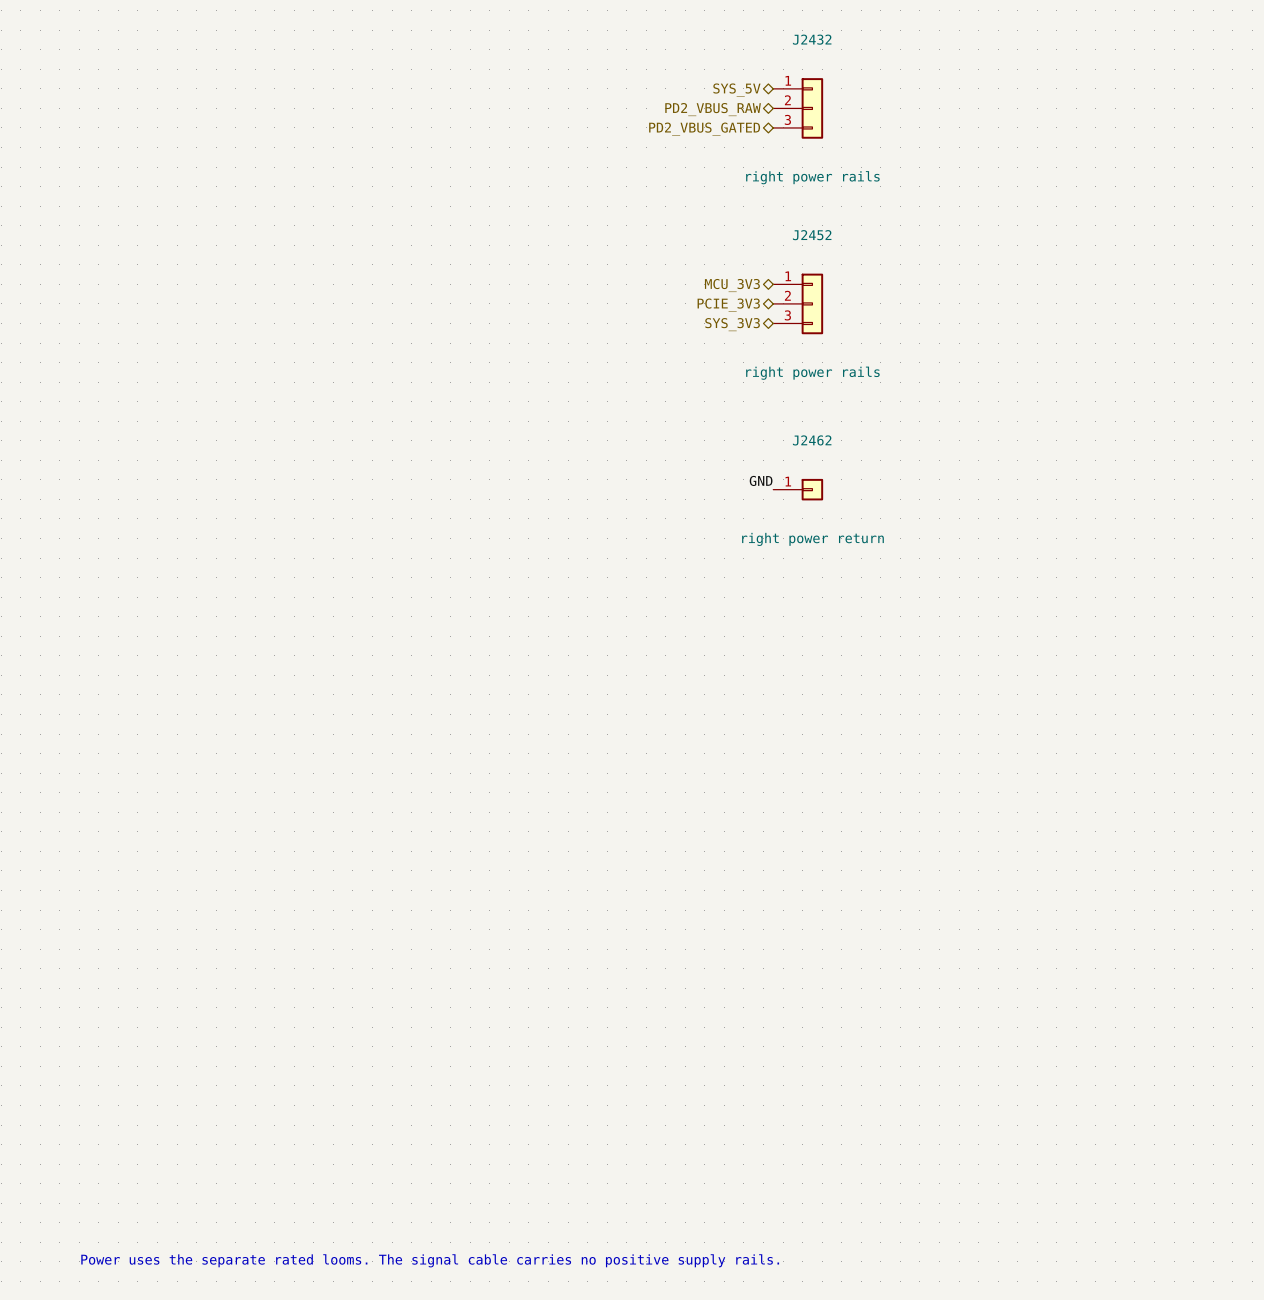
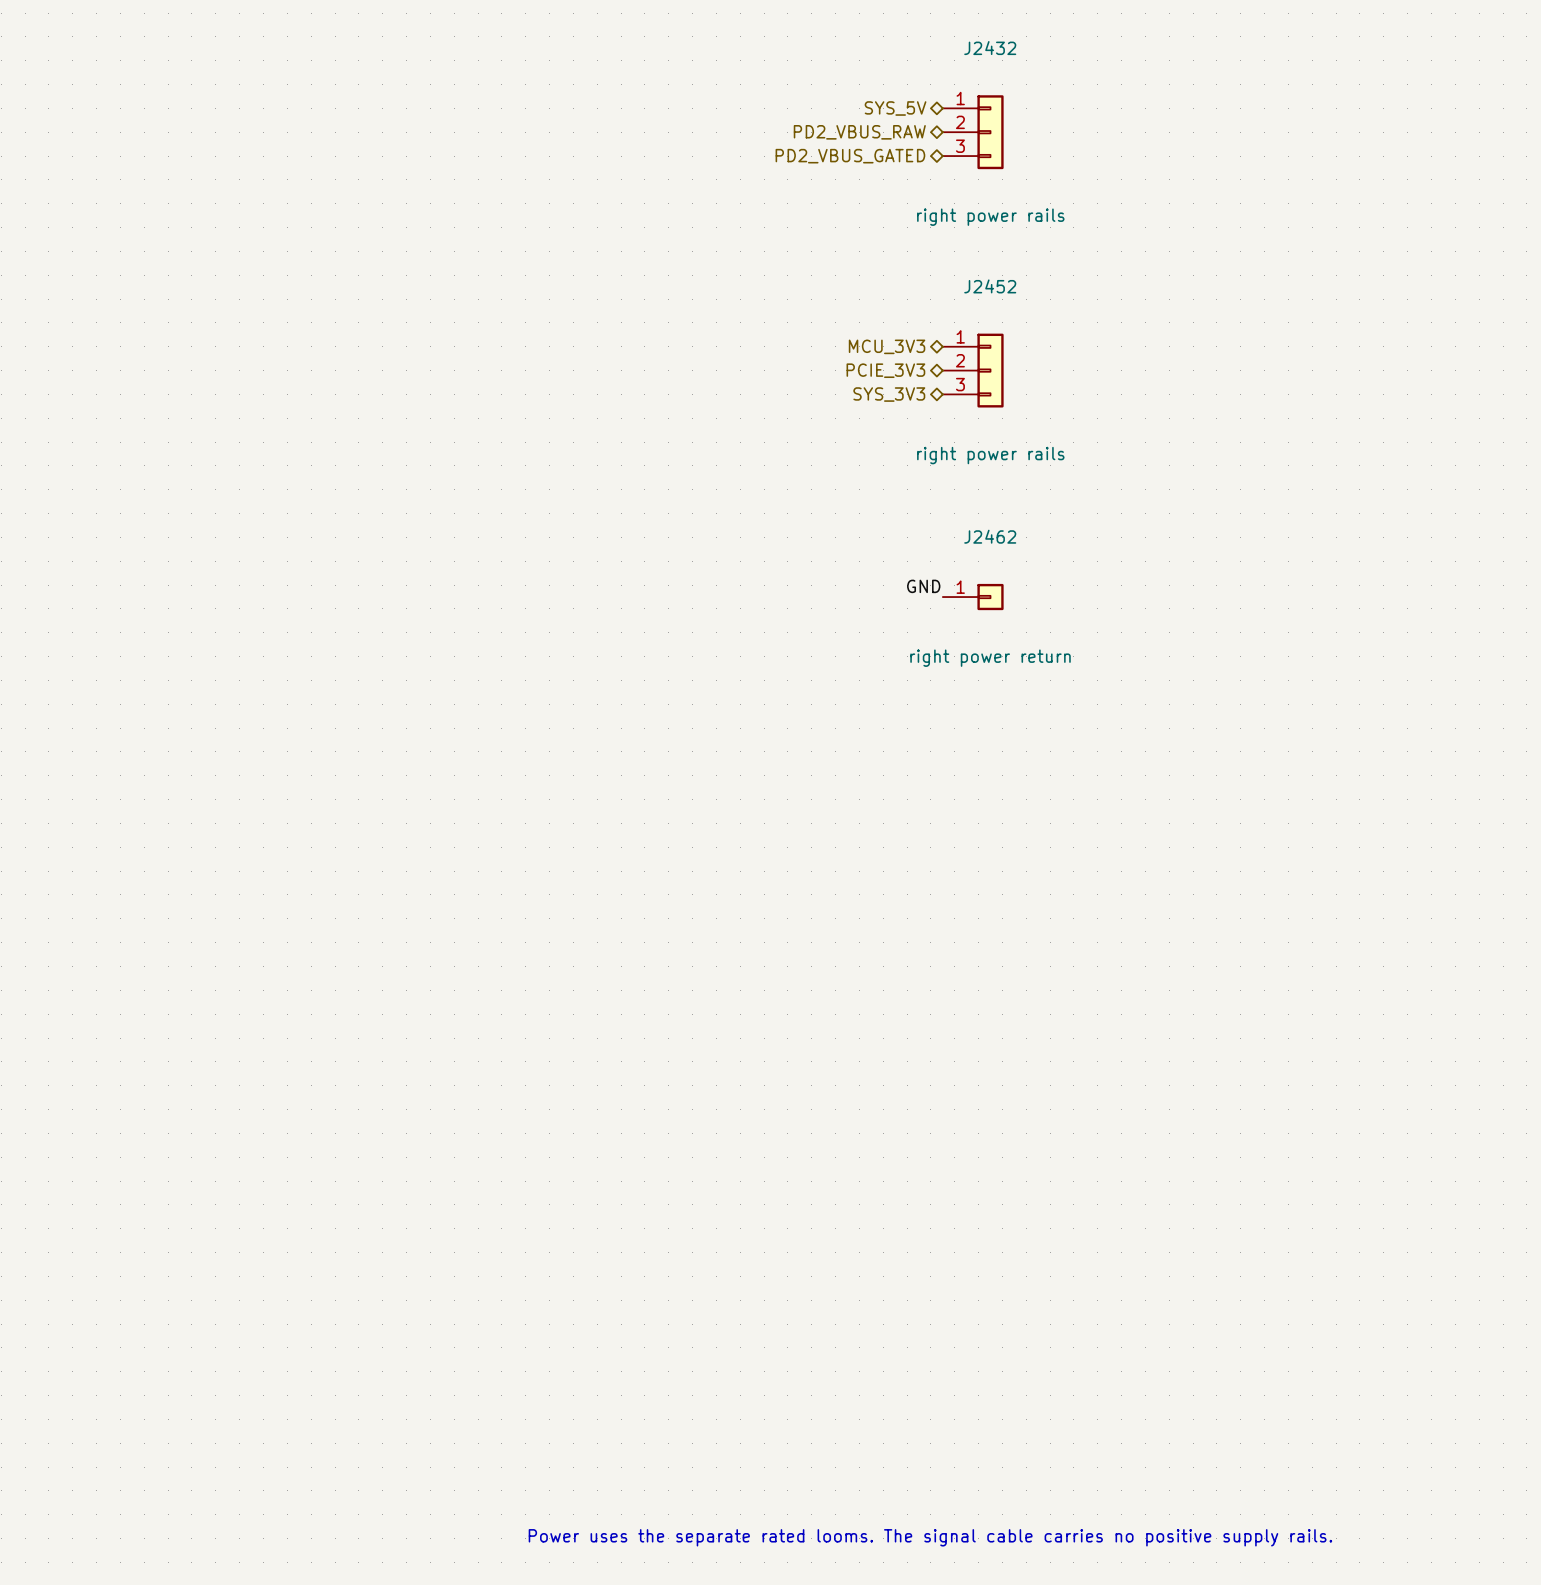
text position: Power uses the separate rated looms. The signal cable carries no positive supply rails. (430, 1260) -> Power uses the separate rated looms. The signal cable carries no positive supply rails. (930, 1537)

